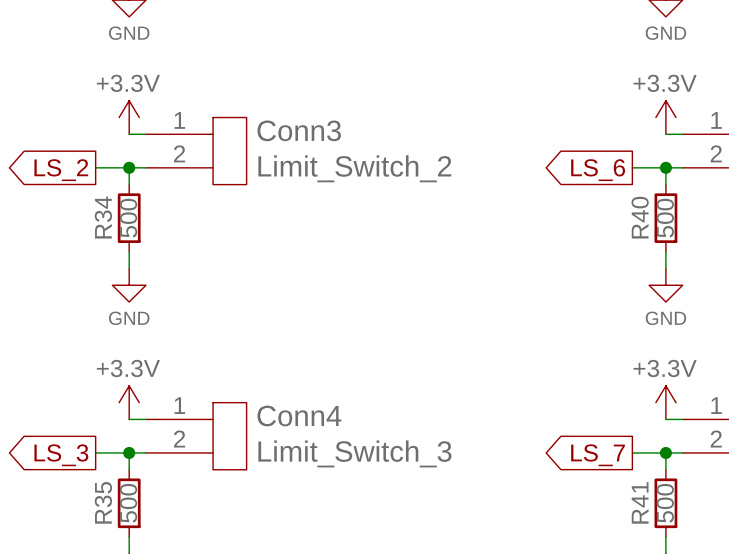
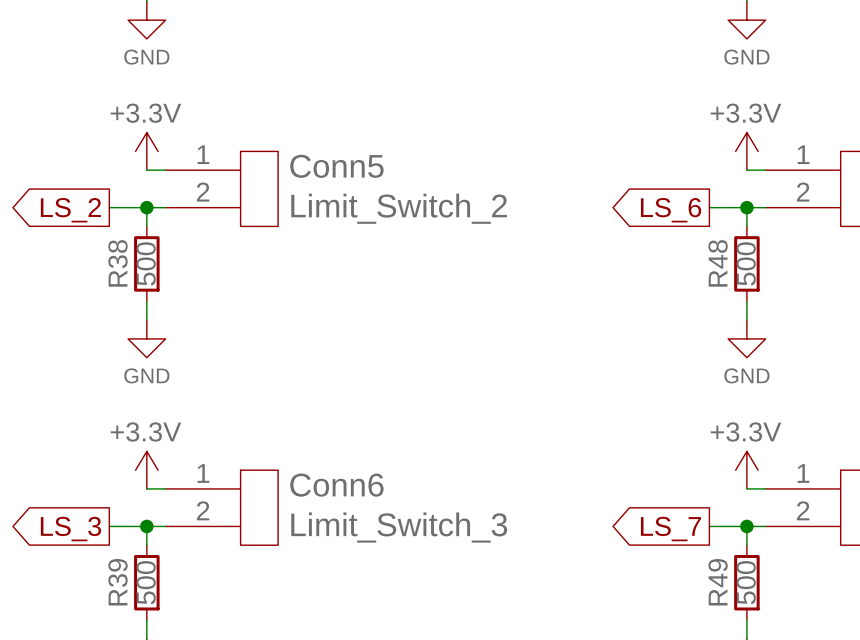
Conn3 name: Conn3 (299, 130) -> Conn5 (336, 166)
R34 name: R34 (103, 217) -> R38 (118, 263)
R40 name: R40 (640, 217) -> R48 (718, 263)
Conn4 name: Conn4 (299, 415) -> Conn6 (336, 485)
R35 name: R35 (103, 502) -> R39 (118, 582)
R41 name: R41 (640, 502) -> R49 (718, 582)

